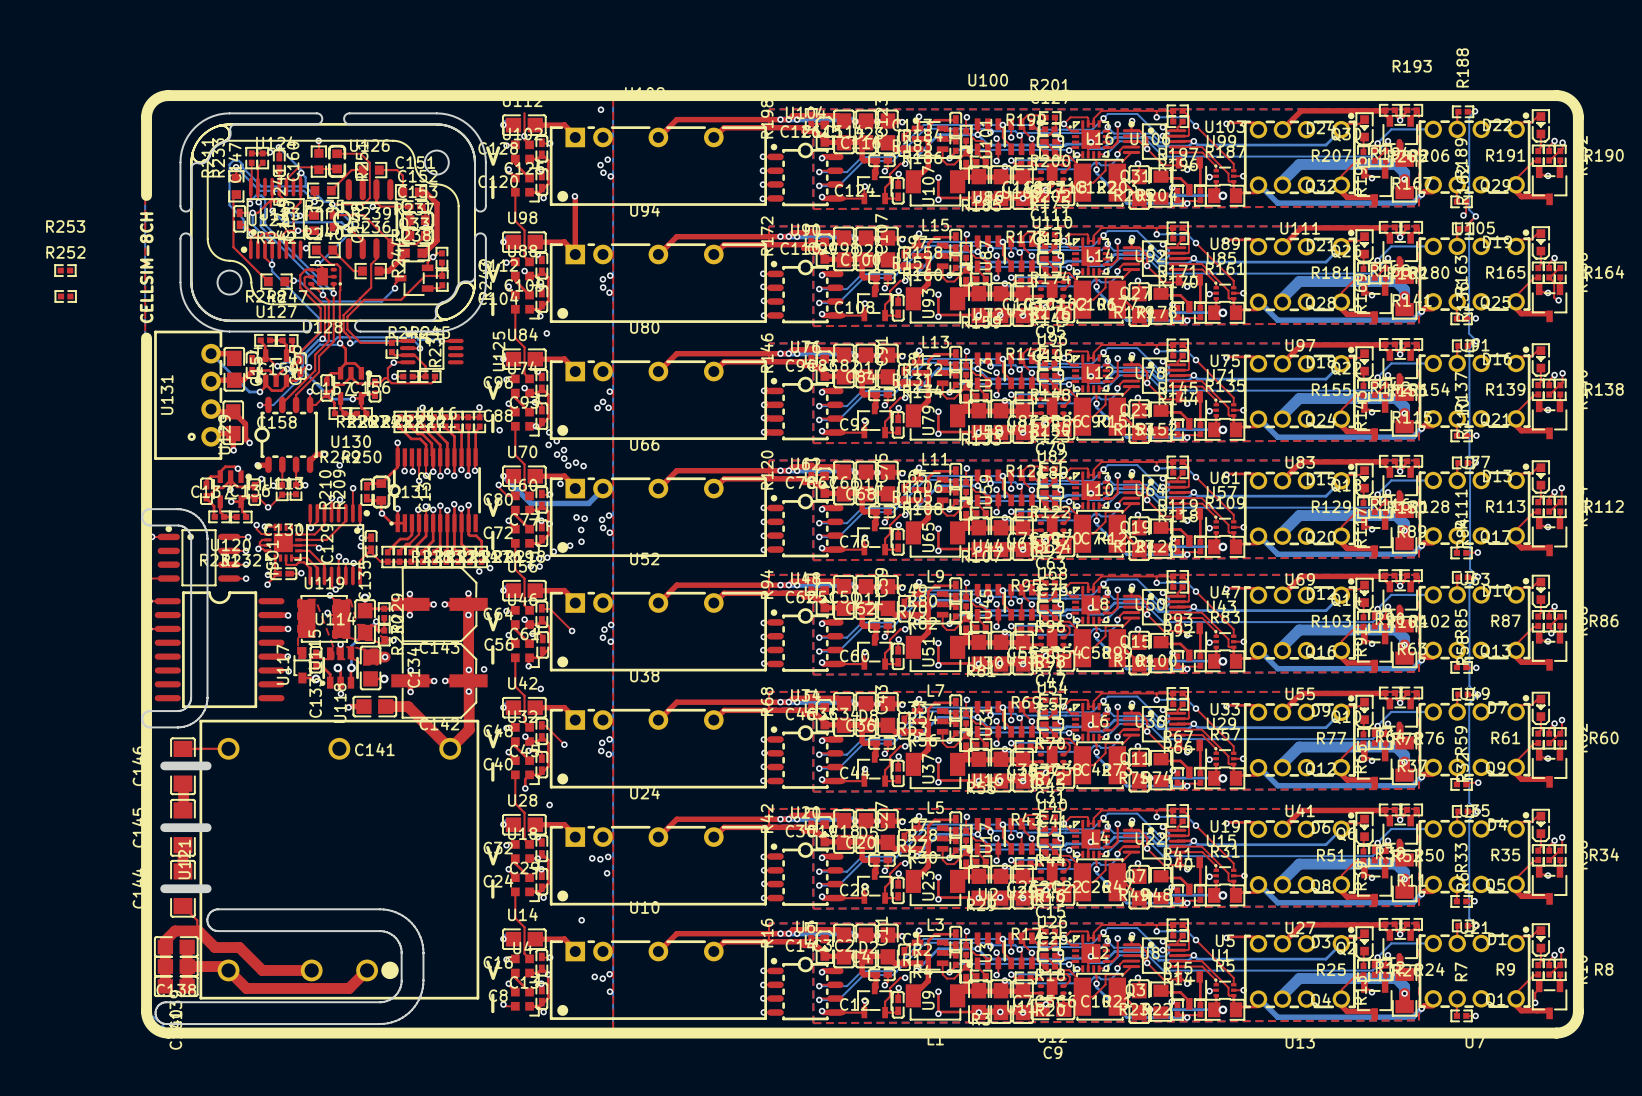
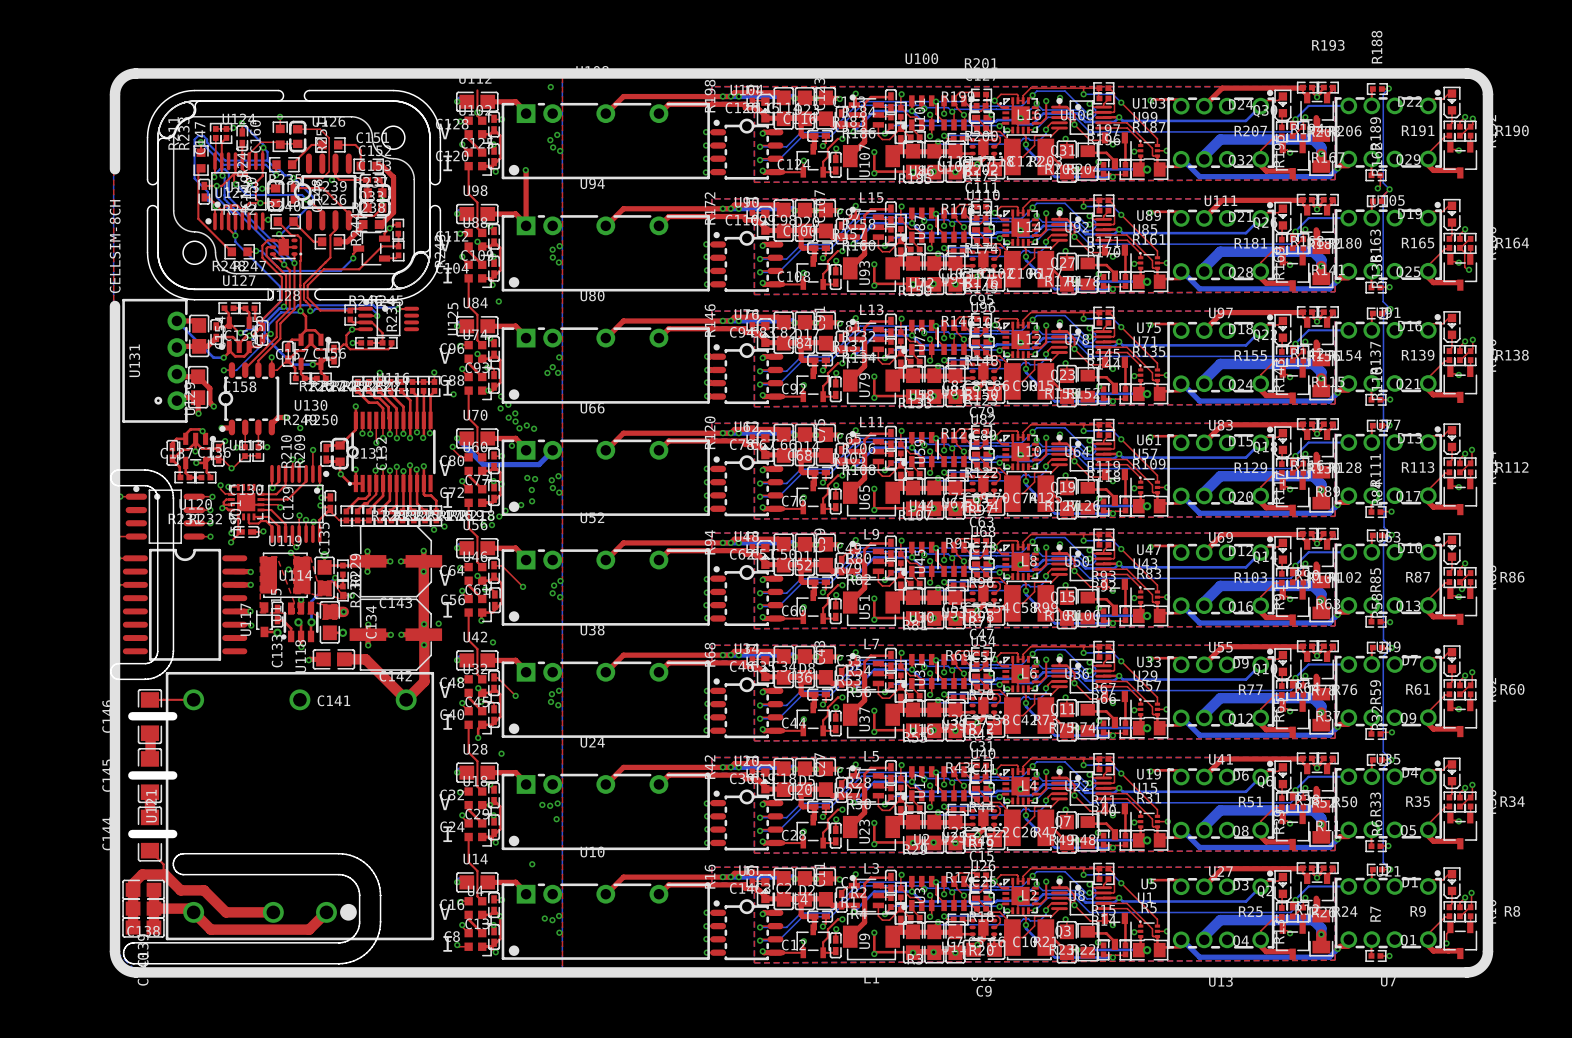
R253: (65, 270) -> none
R252: (65, 296) -> none

